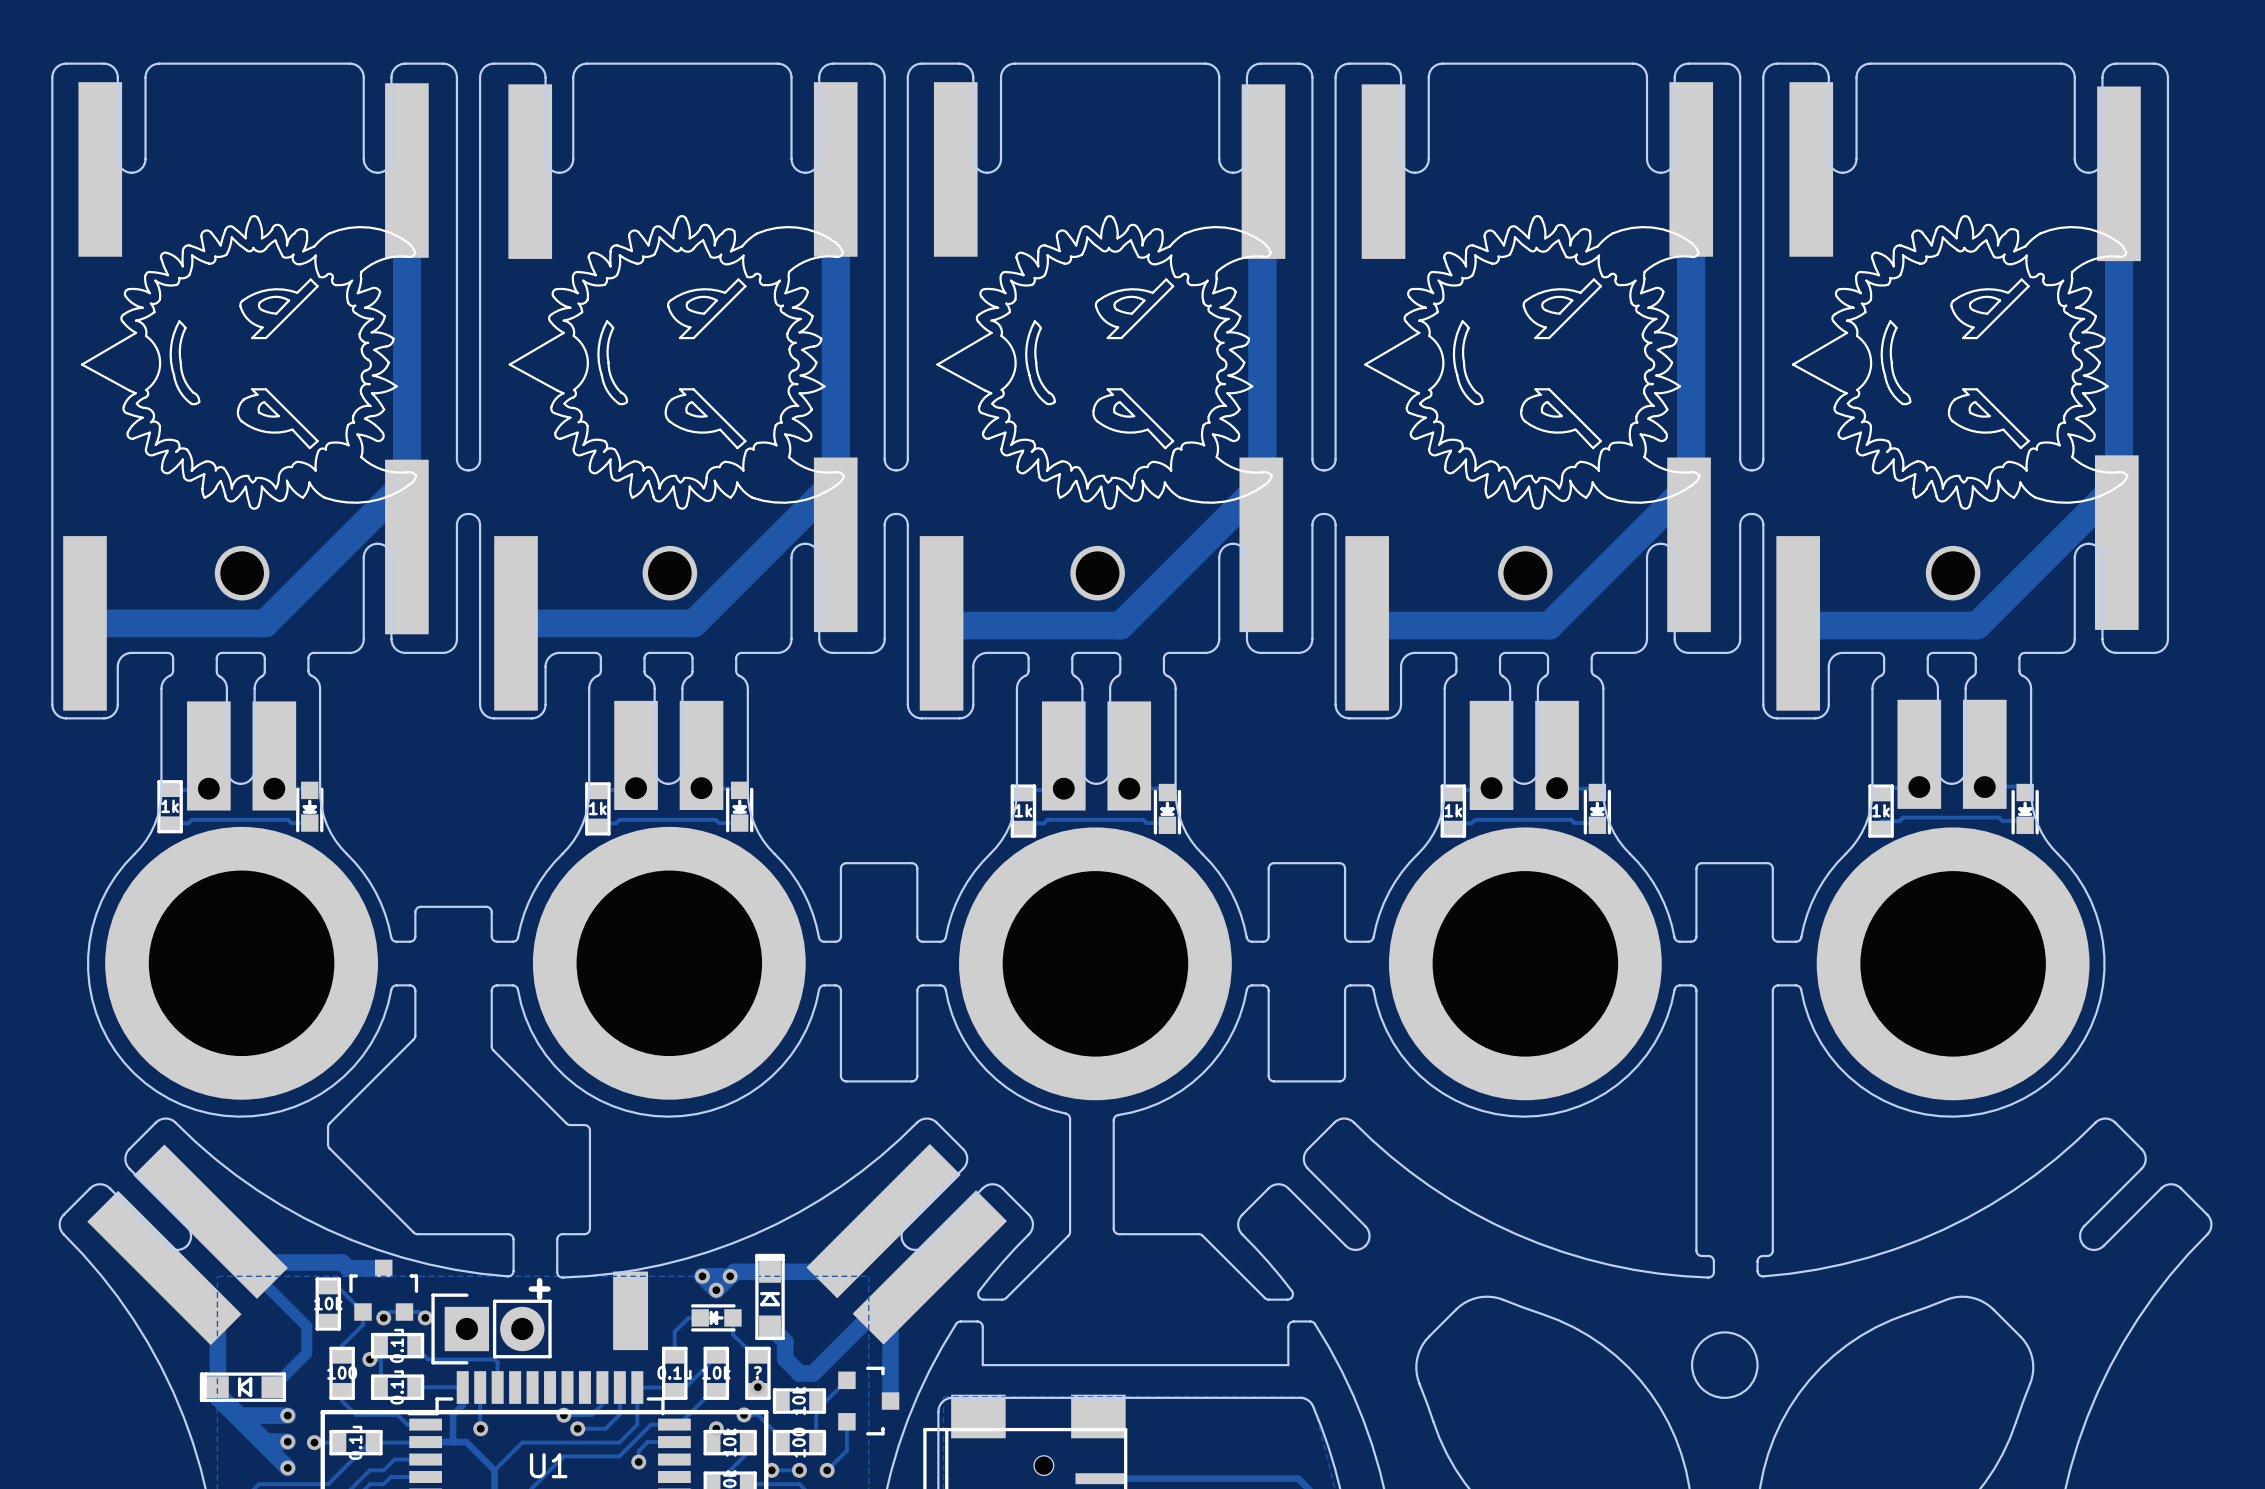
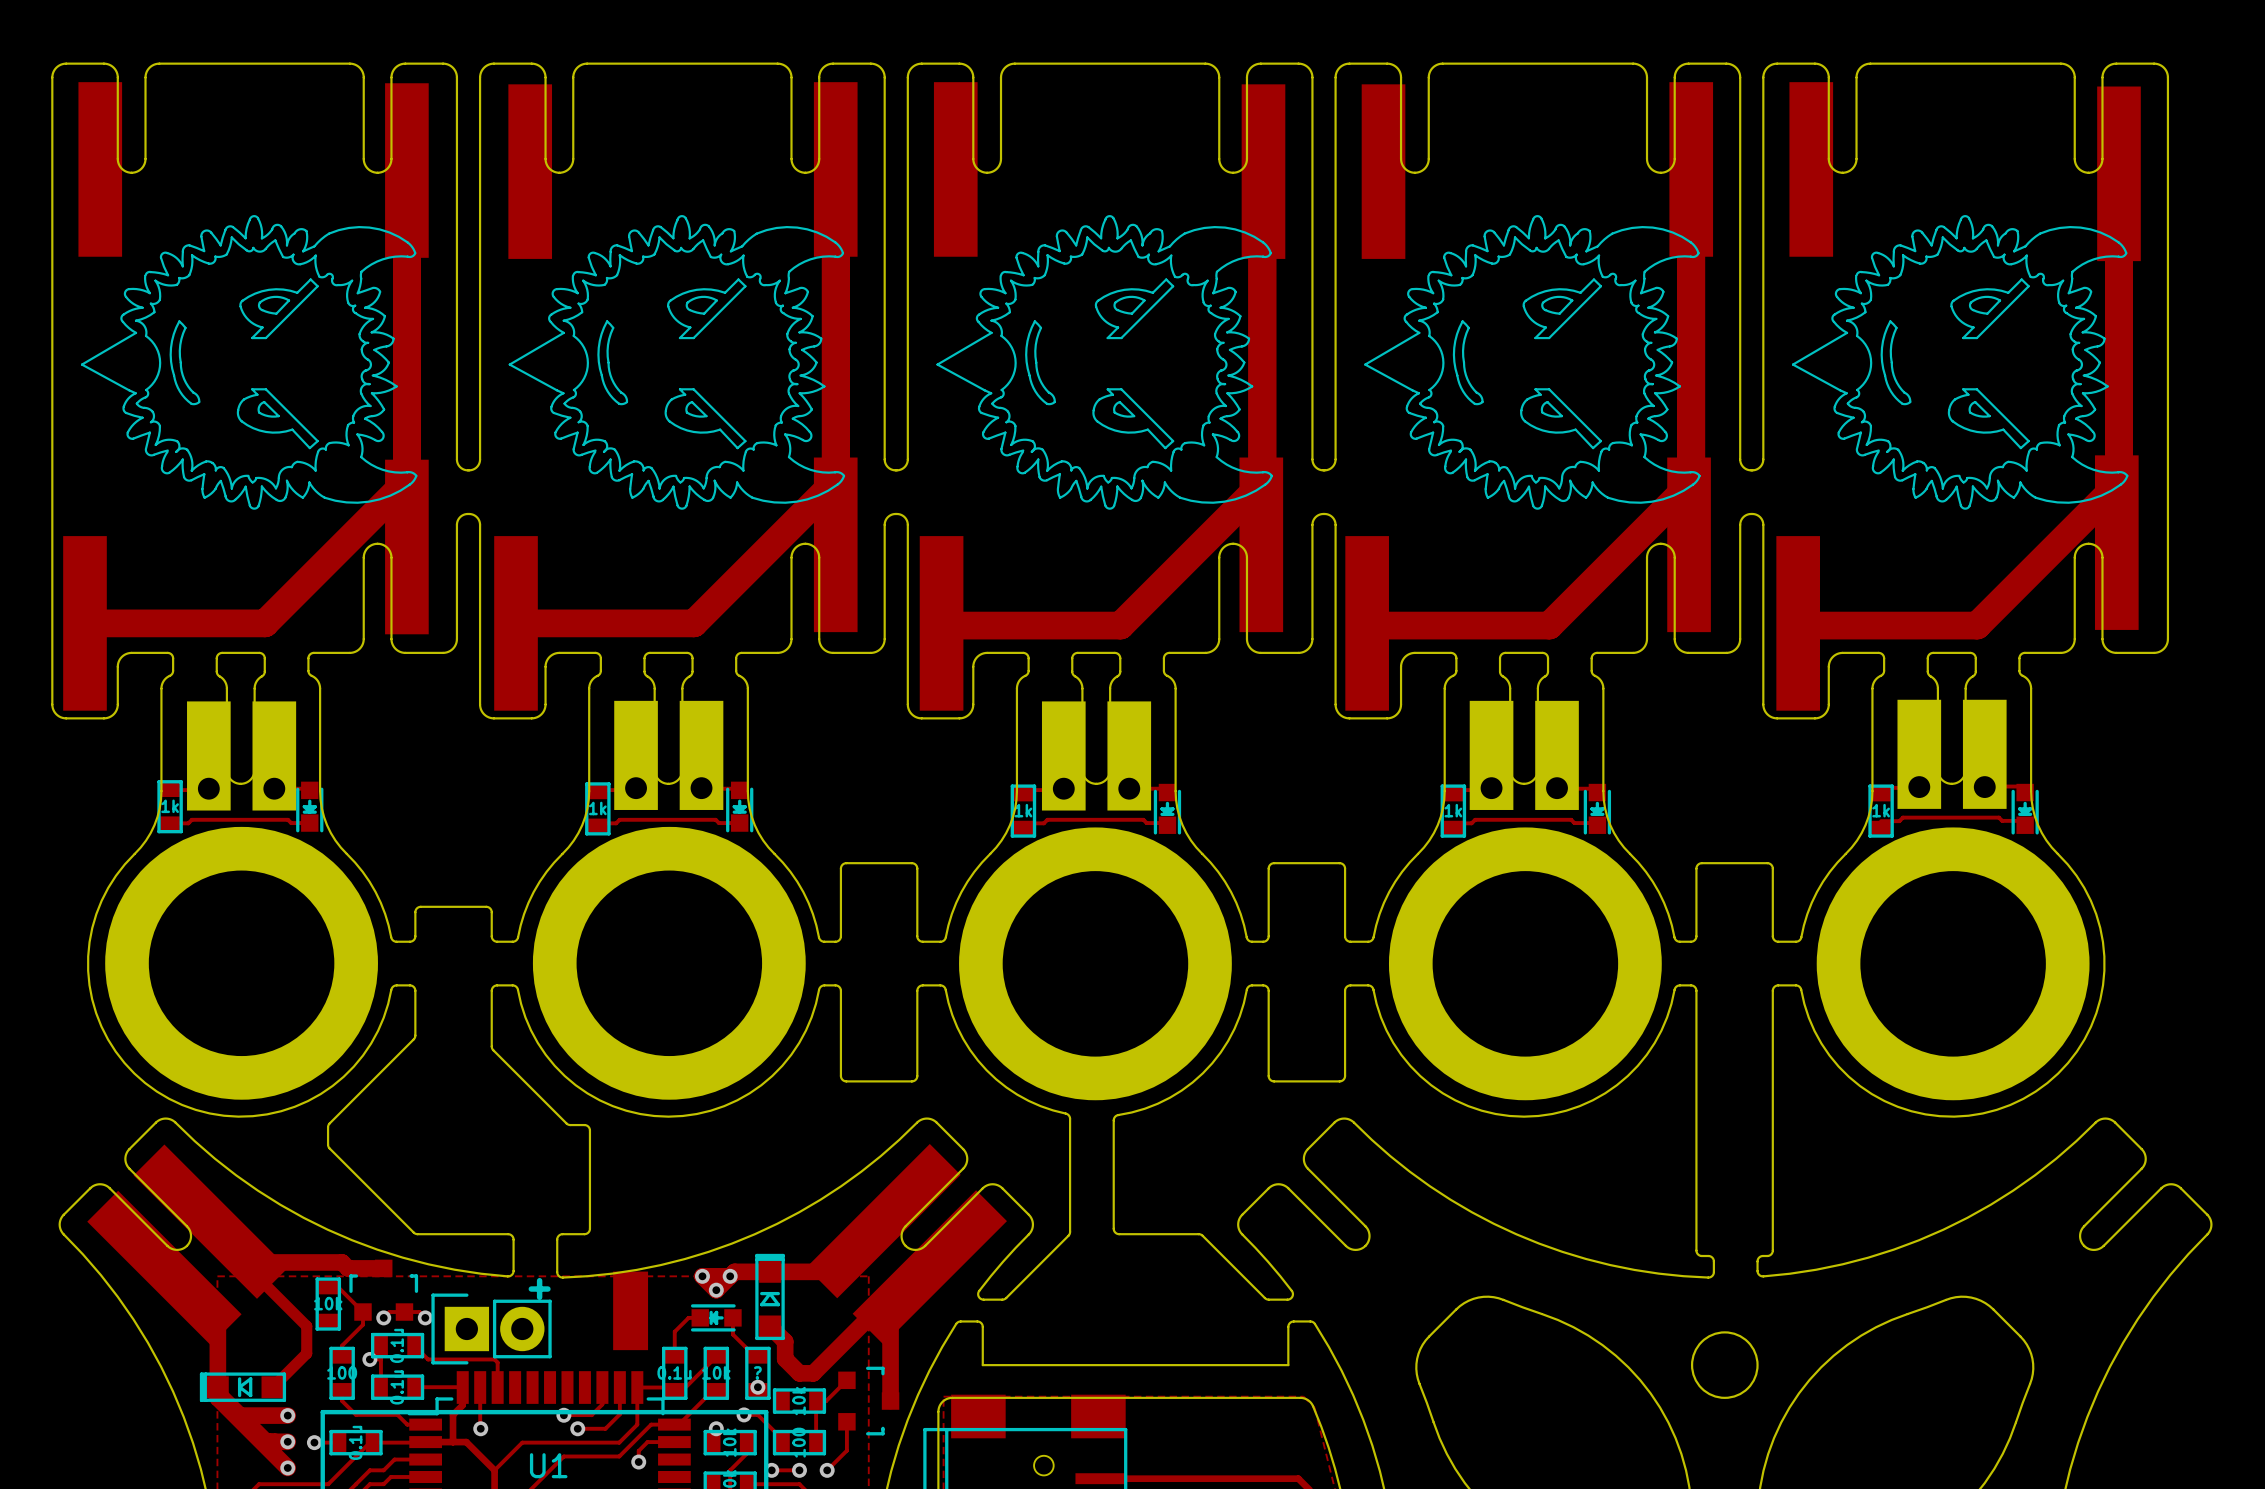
part: (242, 573) -> none
part: (669, 573) -> none
part: (1097, 573) -> none
part: (1525, 573) -> none
part: (1953, 573) -> none

